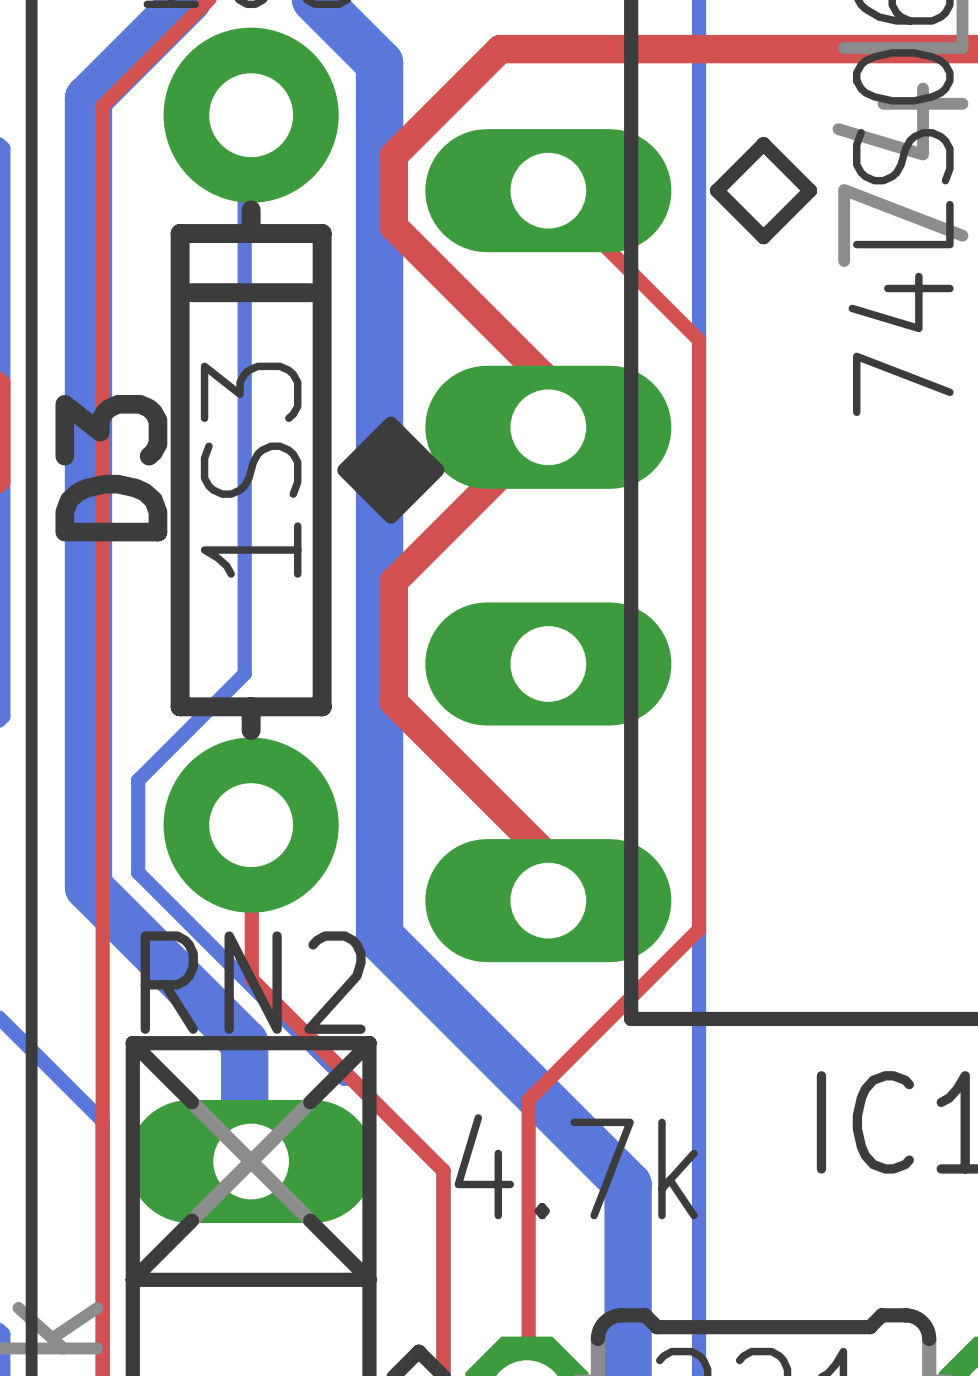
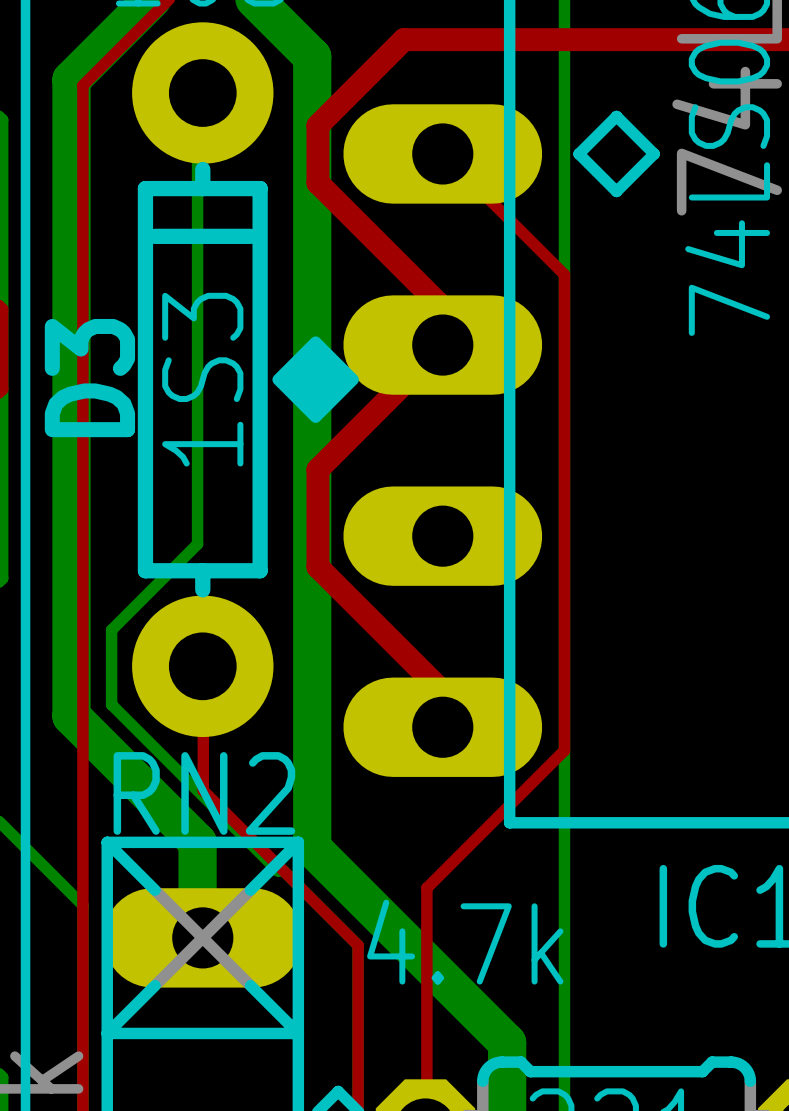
bottom track: (379, 63) (379, 936) (628, 1185) (628, 1291) -> (306, 51) (312, 56) (312, 847) (507, 1042)

